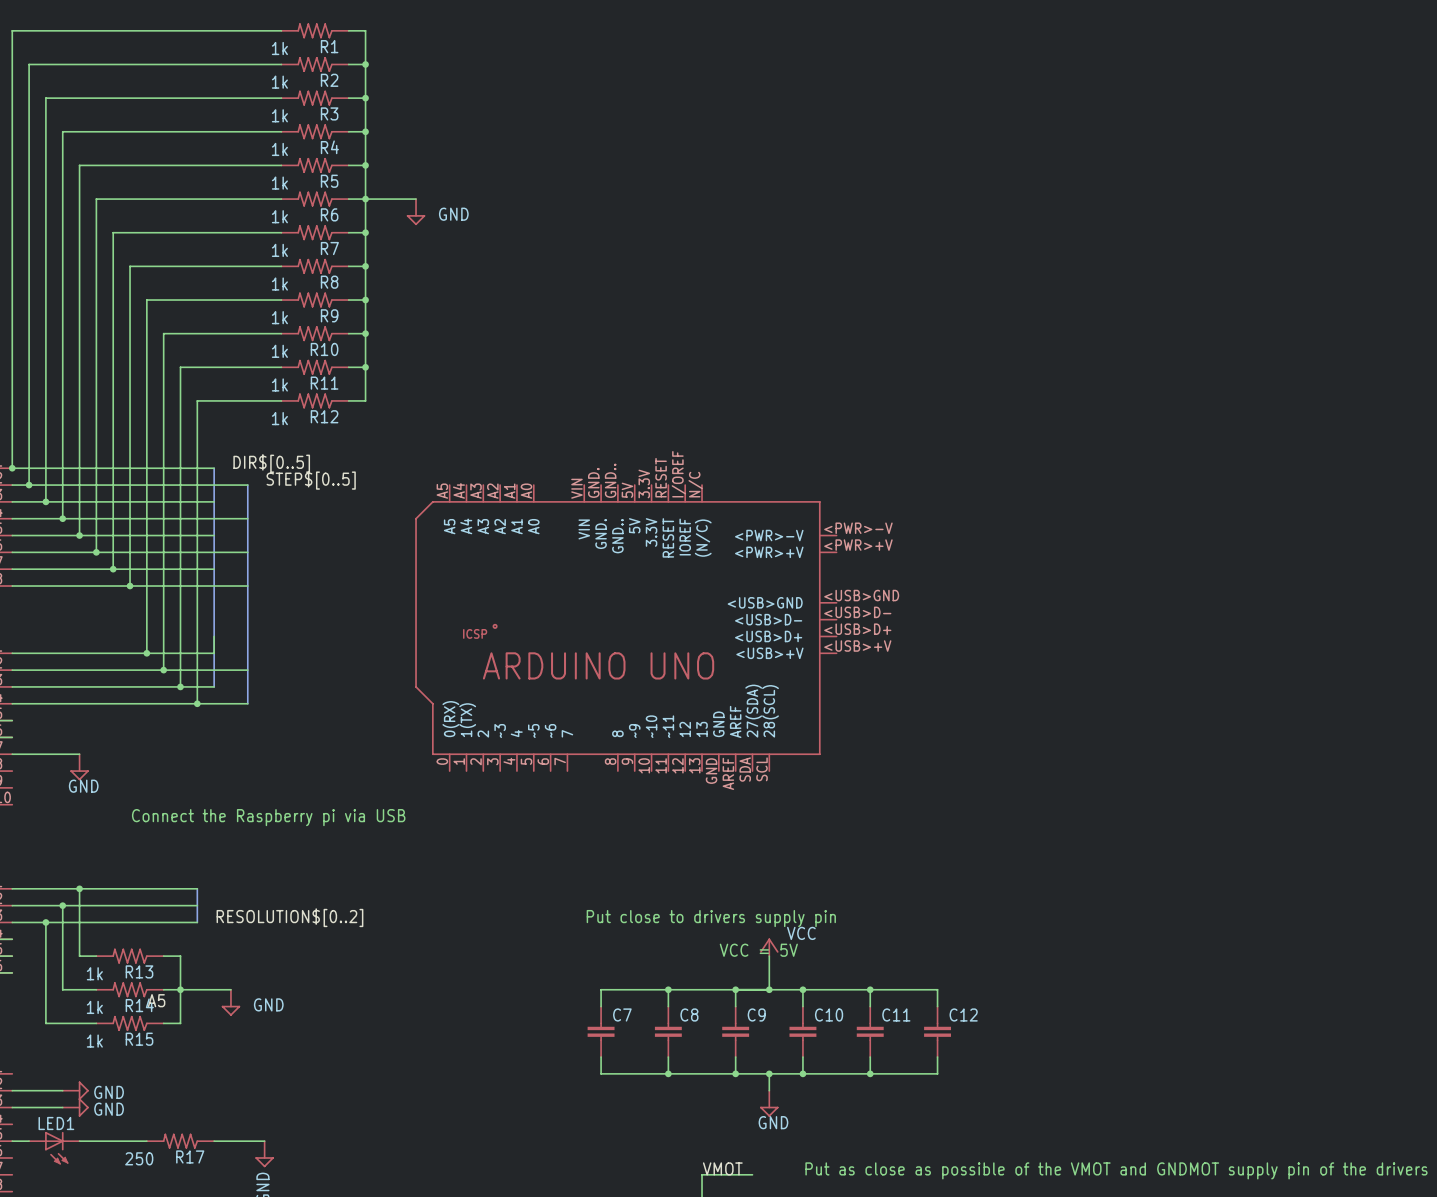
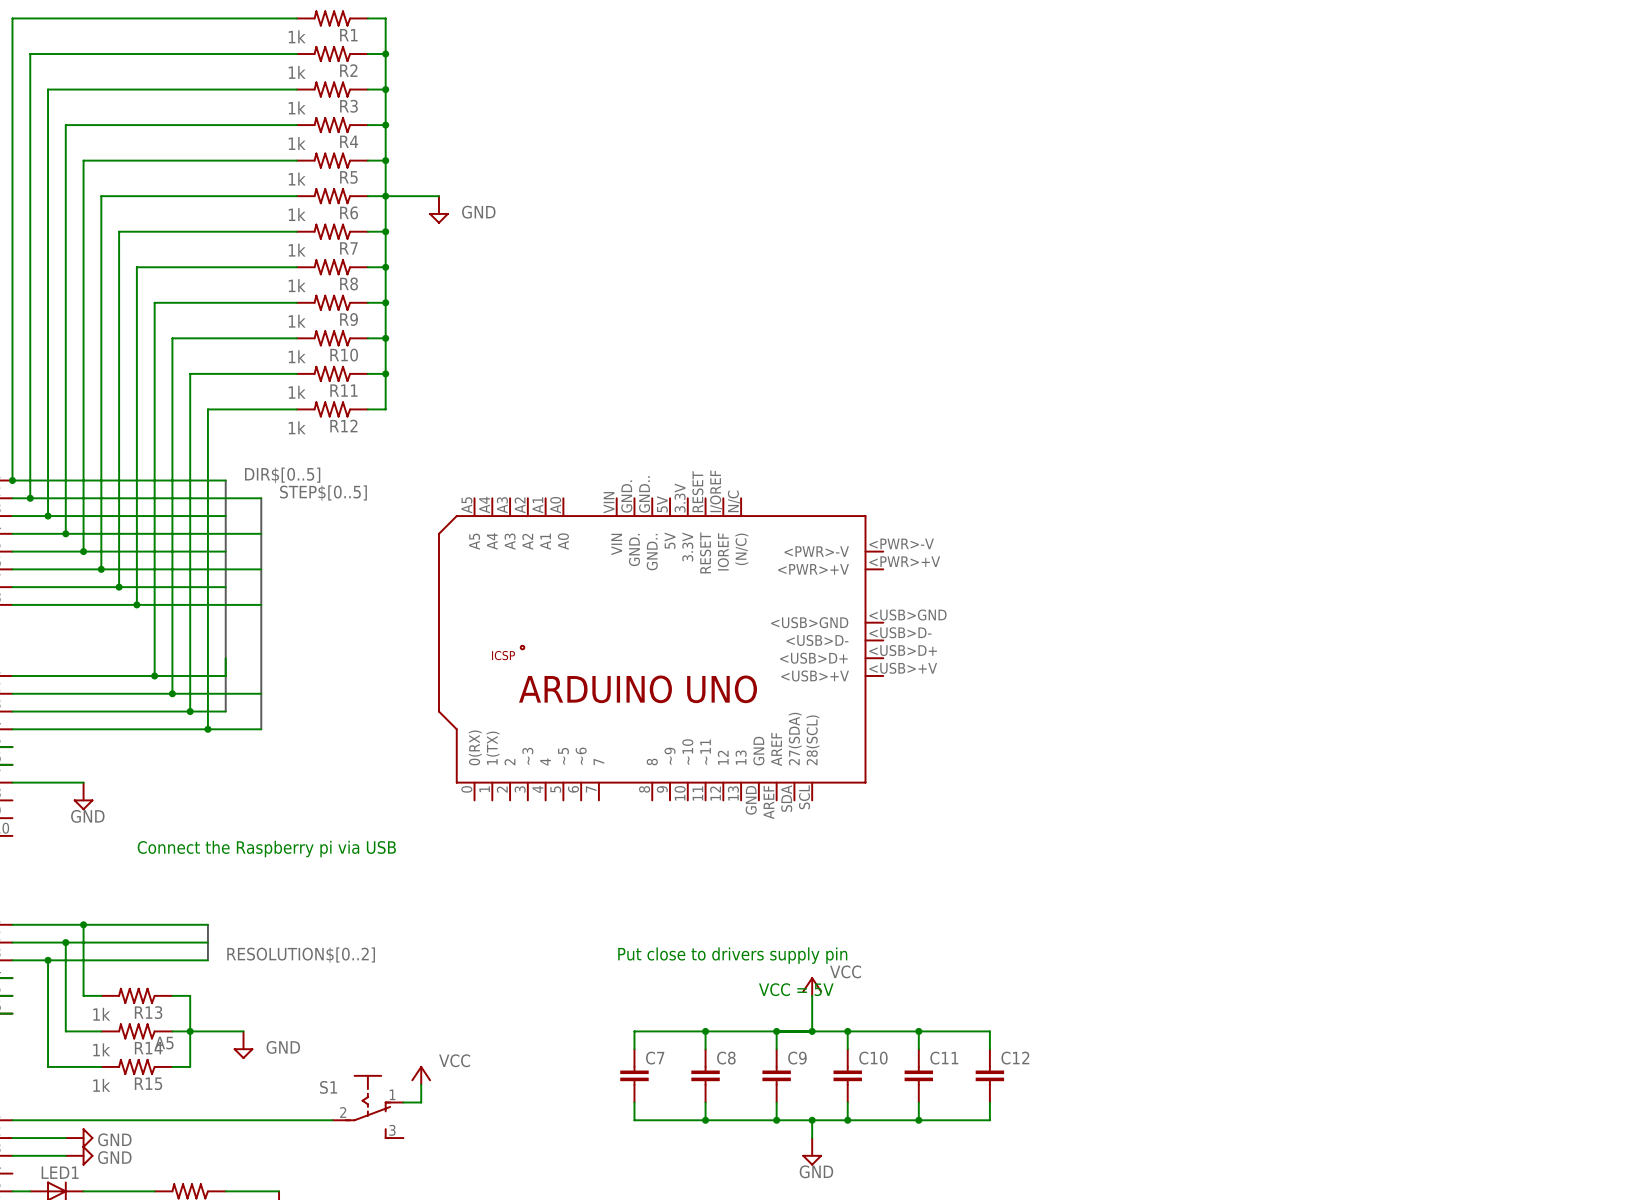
power symbol: none -> VCC (421, 1075)
wire: none -> (421, 1084) (421, 1102) (403, 1102)
S1: none -> (367, 1106)
wire: none -> (12, 1120) (332, 1120)

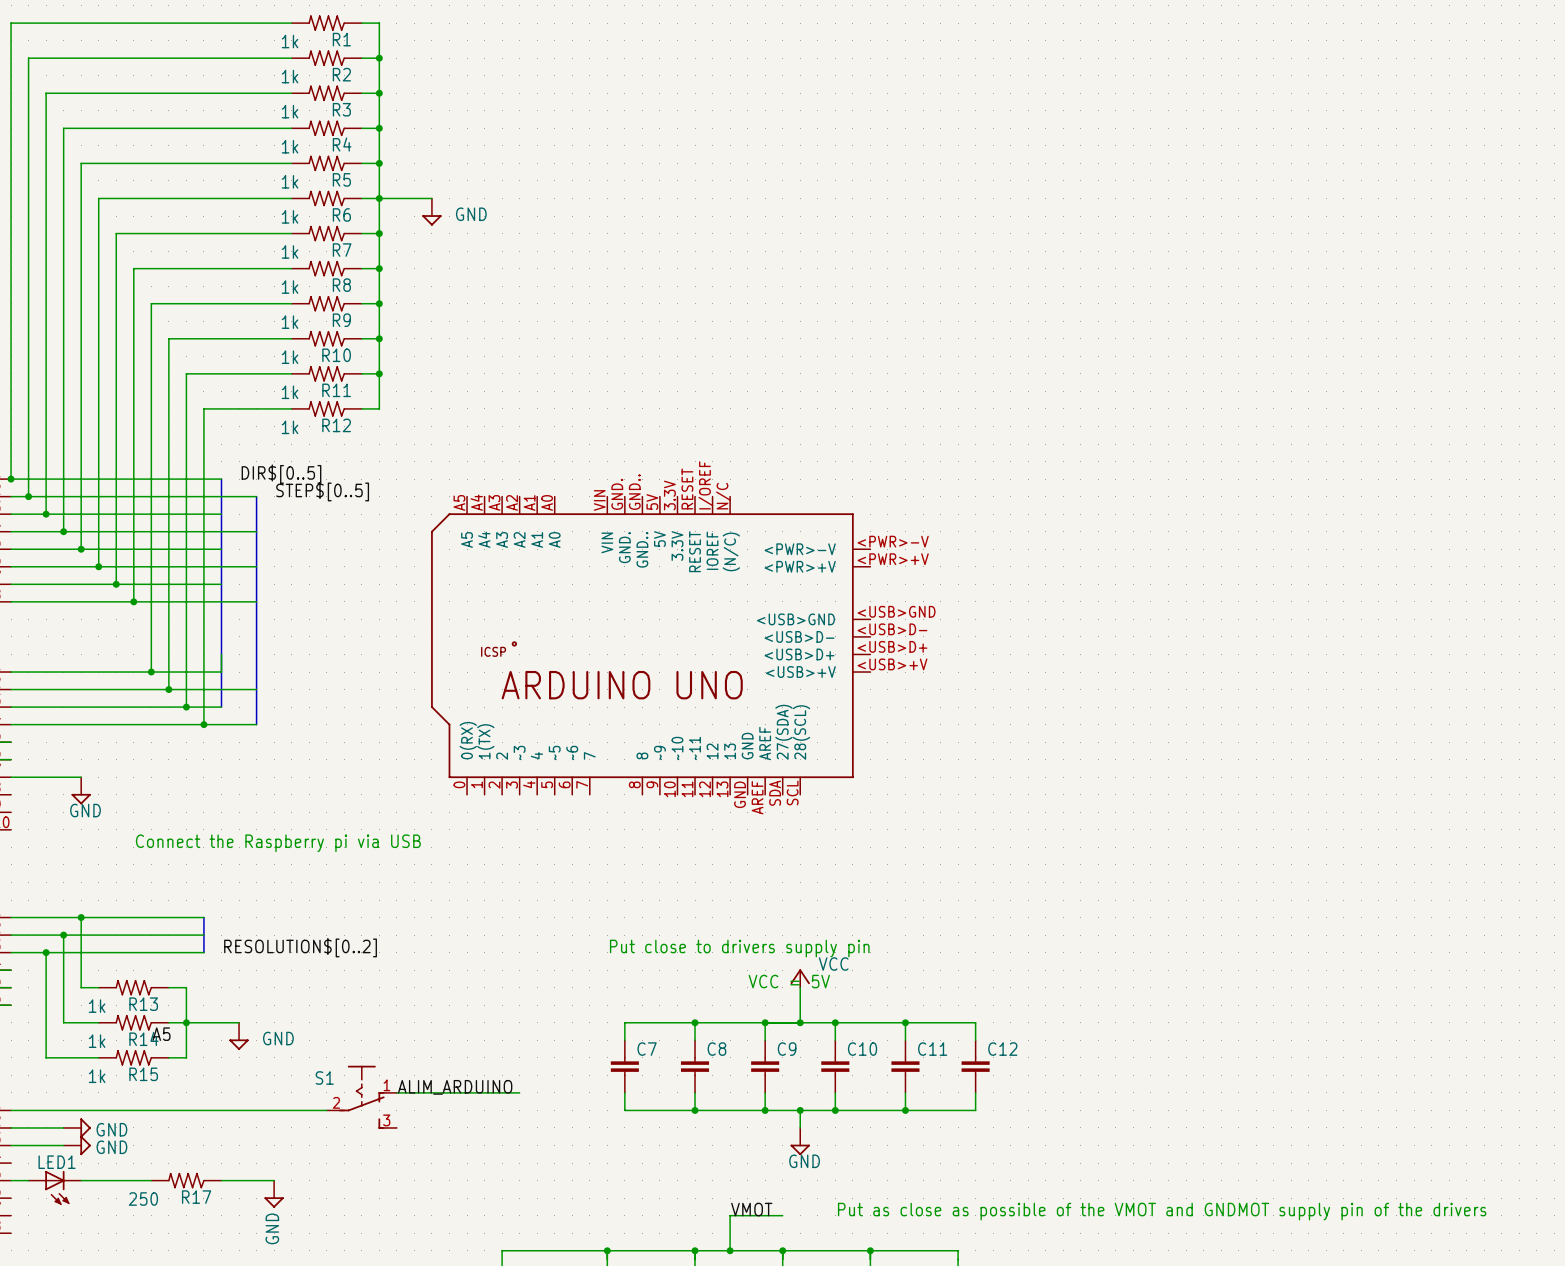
power symbol: VCC (421, 1075) -> none
wire: (421, 1084) (421, 1102) -> (519, 1092) (414, 1092)
label: none -> ALIM_ARDUINO (455, 1087)

